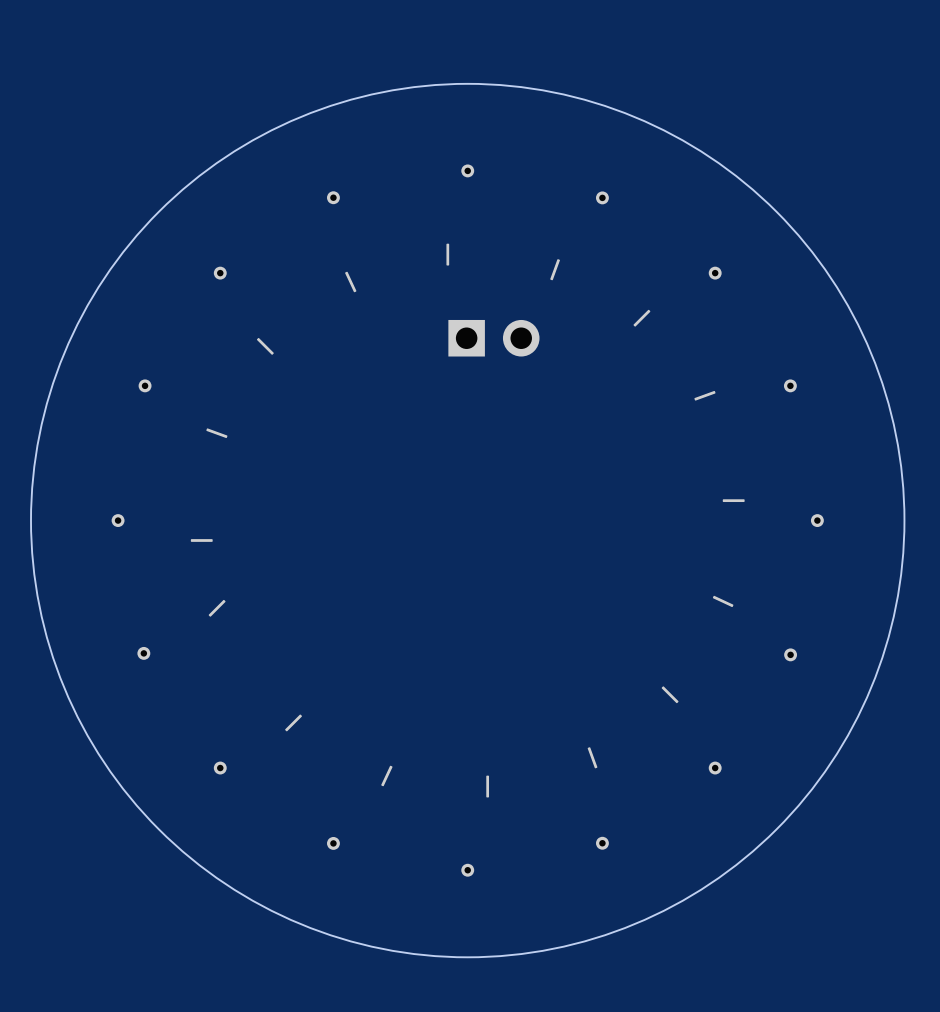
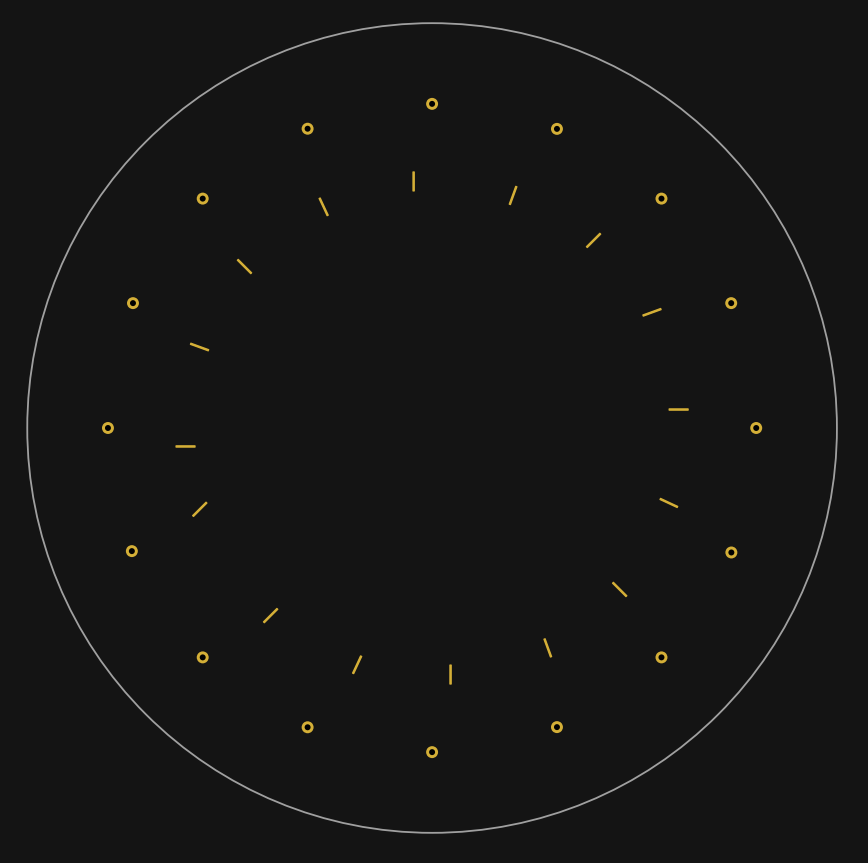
part: (493, 338) -> none

